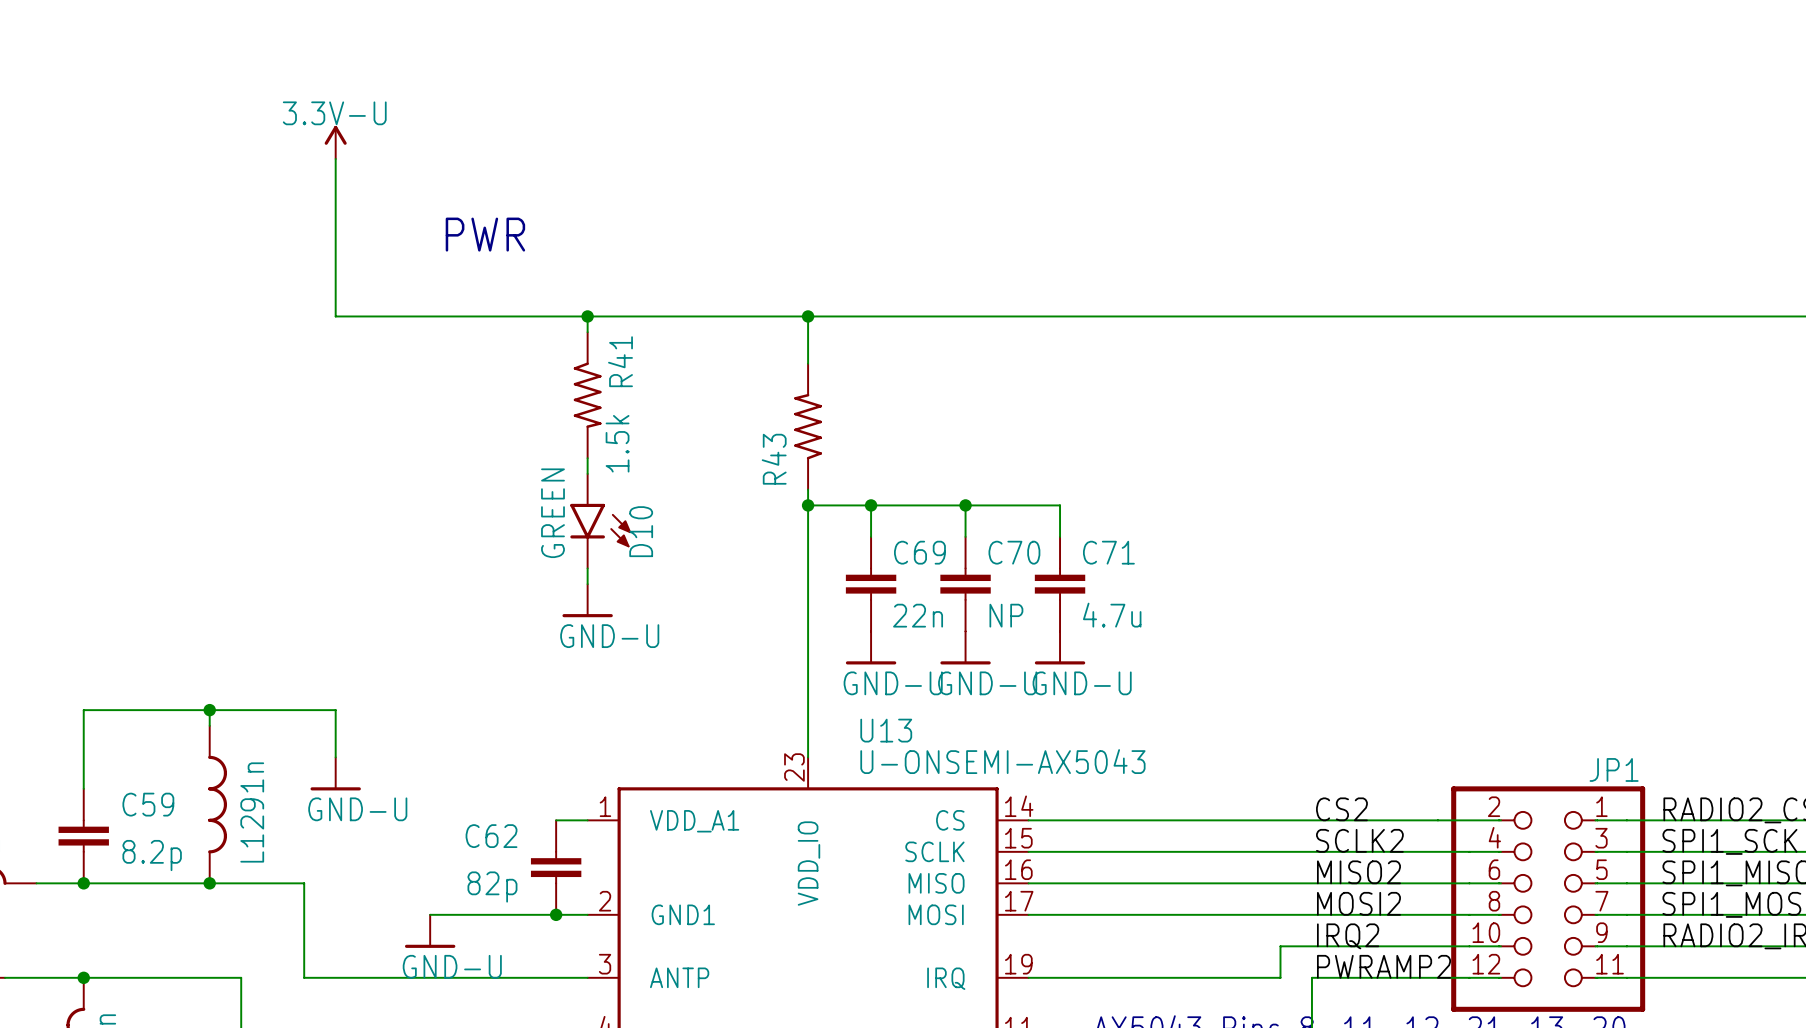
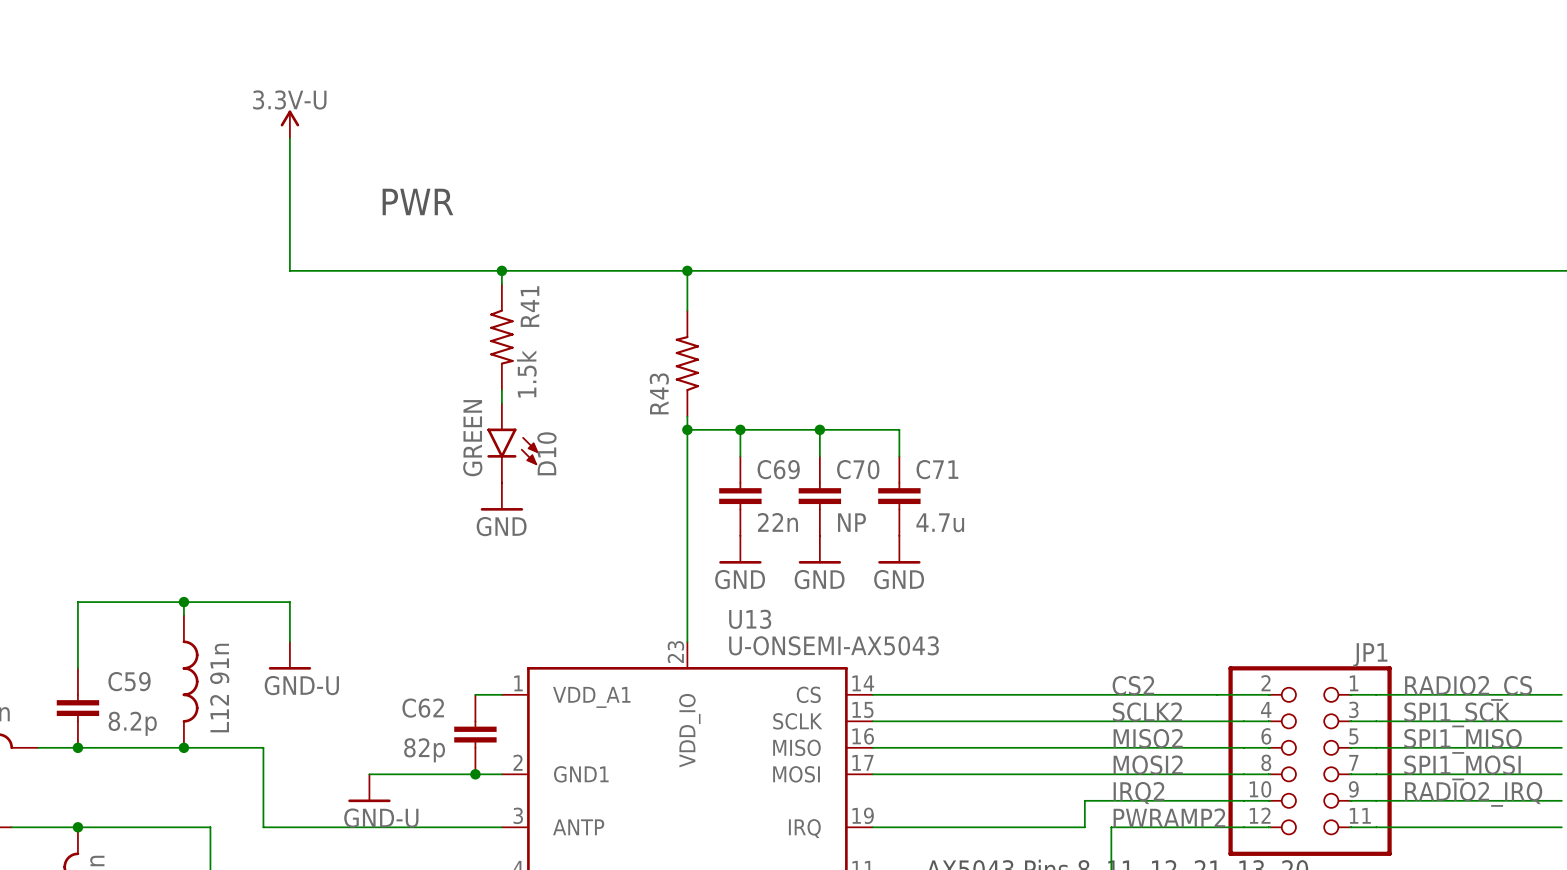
power symbol: none -> GND (501, 496)
power symbol: GND-U (587, 600) -> none
power symbol: GND-U (871, 647) -> GND (740, 549)
power symbol: GND-U (965, 647) -> GND (819, 549)
power symbol: GND-U (1060, 647) -> GND (899, 549)

